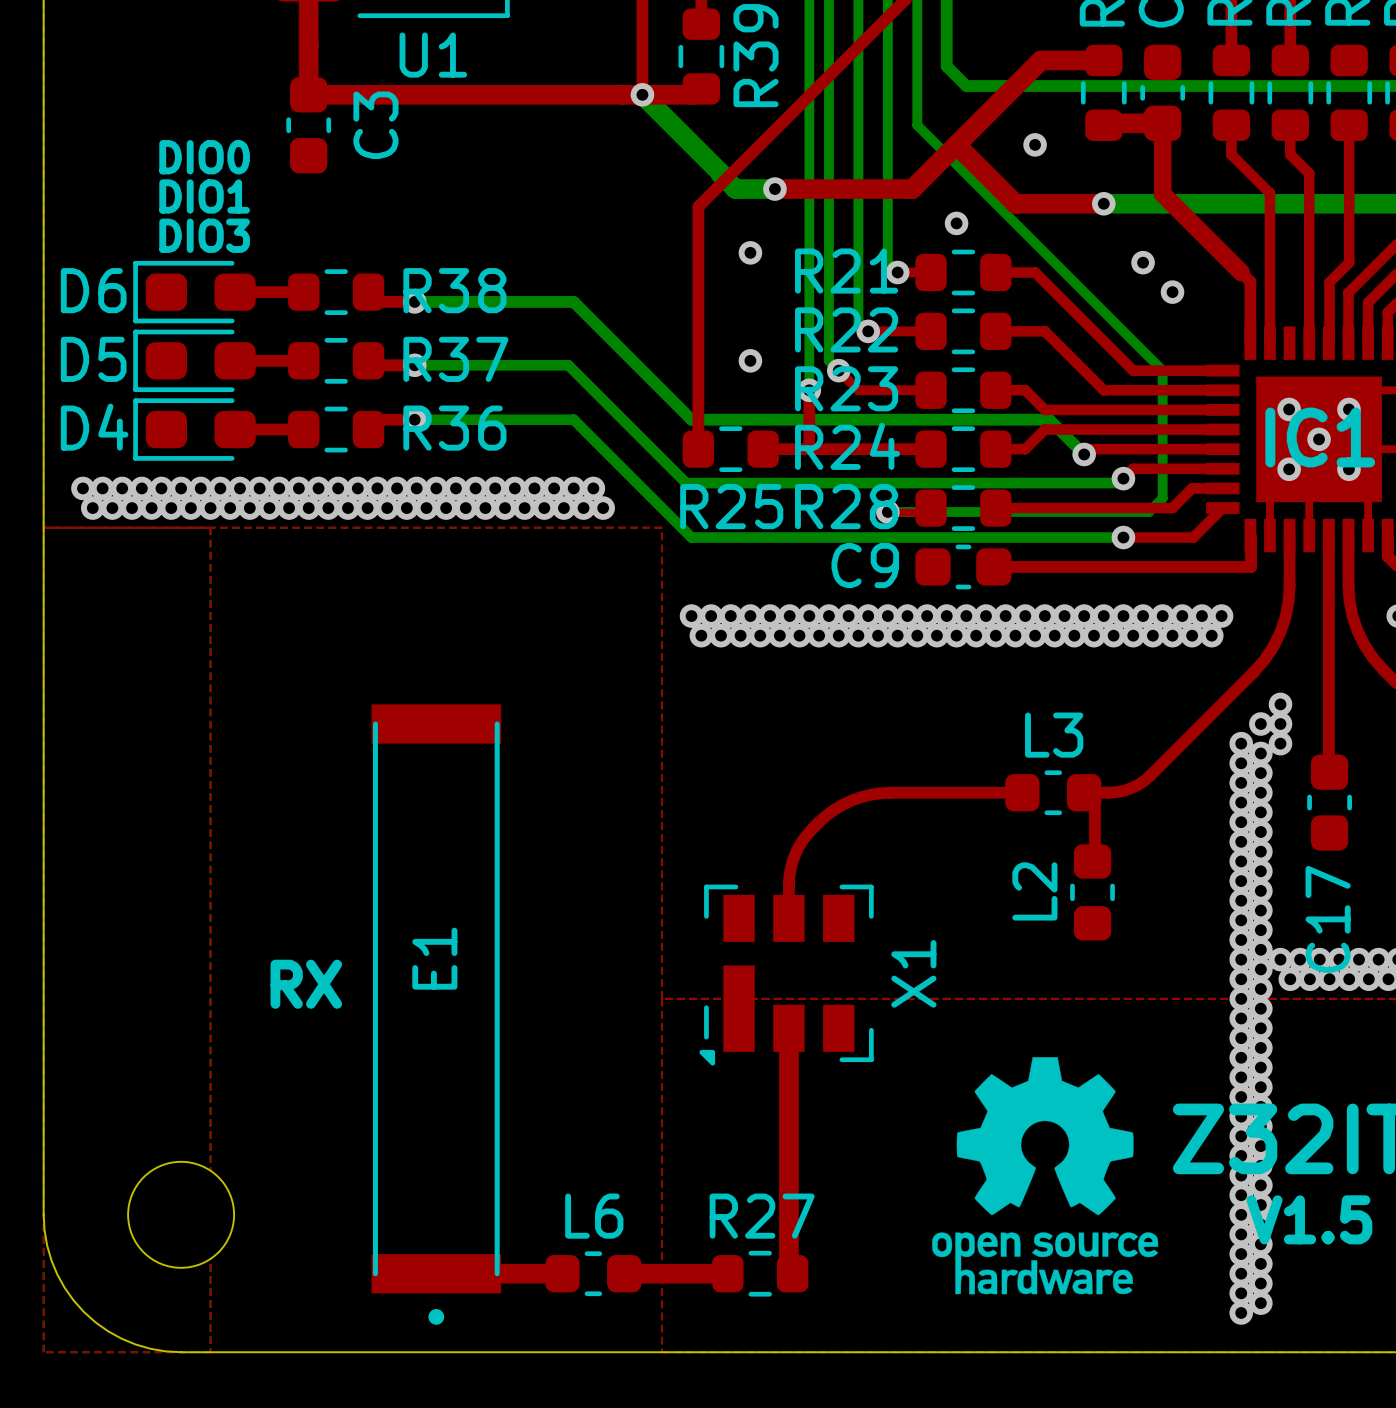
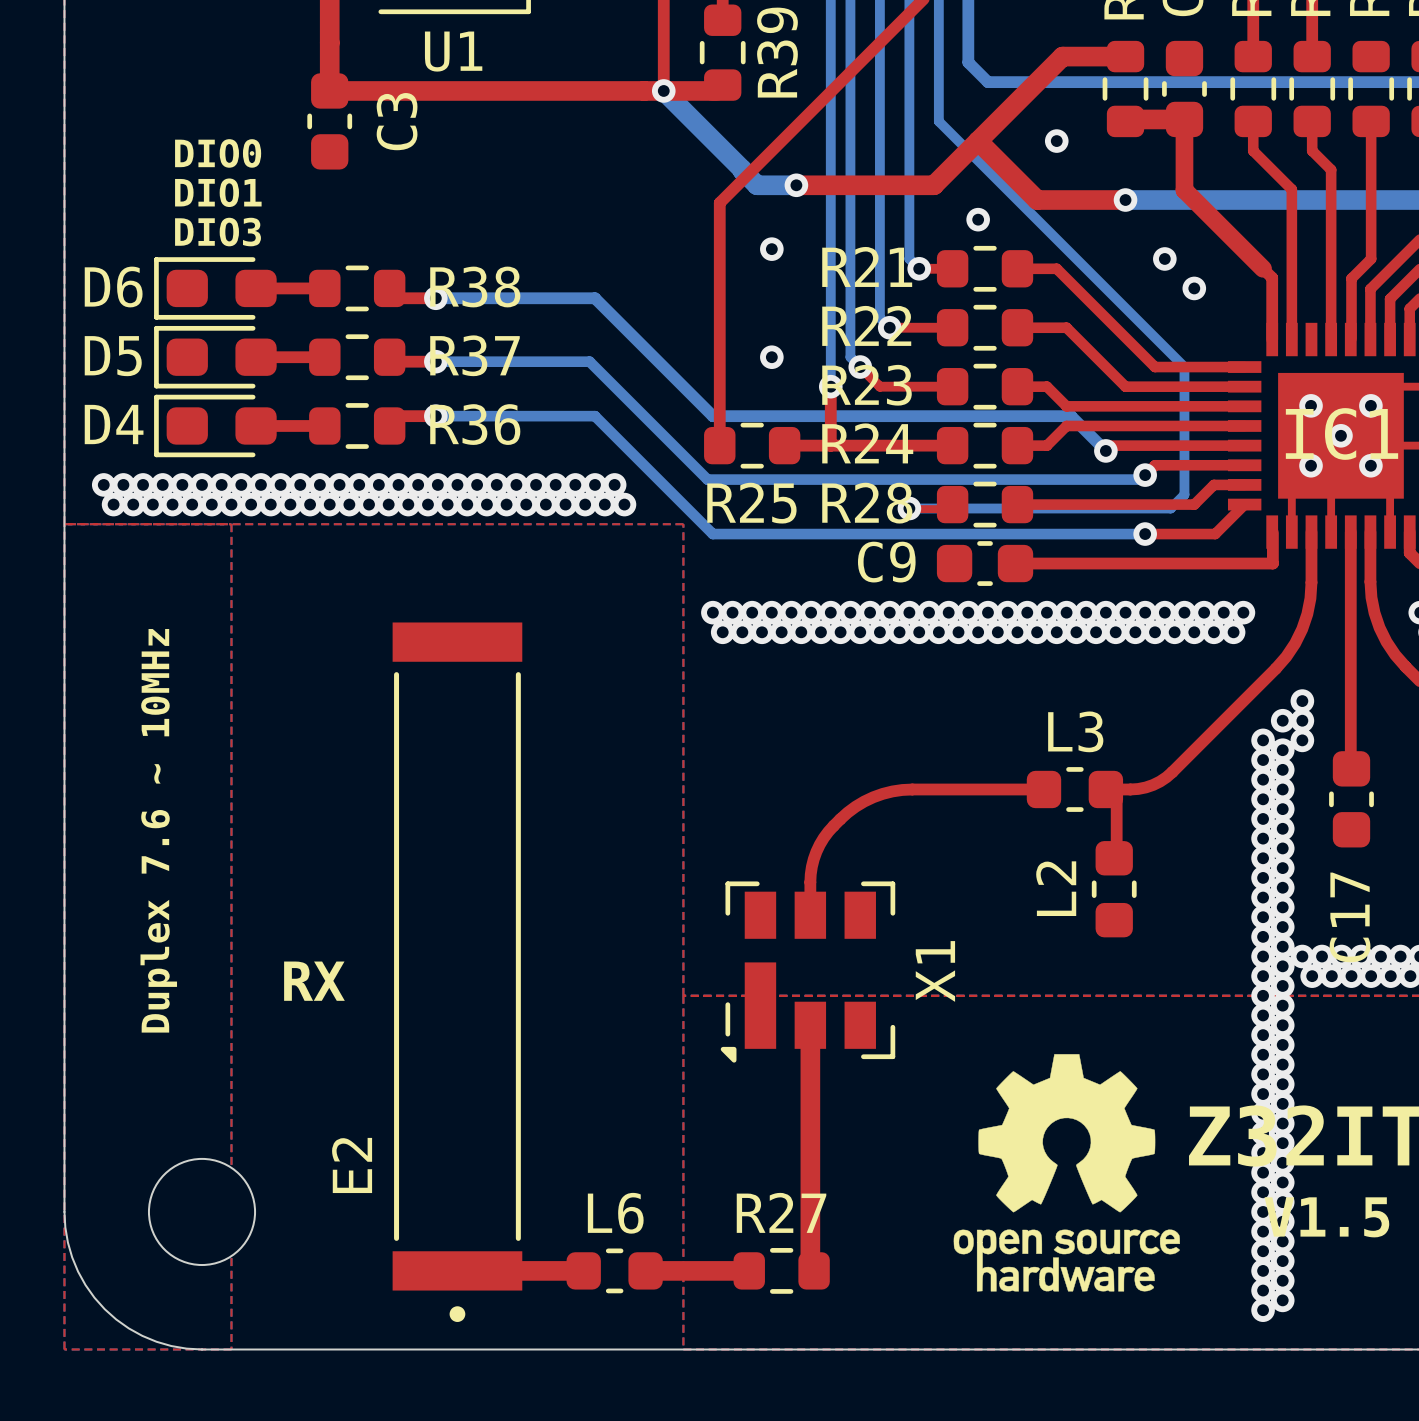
text: none -> Duplex 7.6 ~ 10MHz (158, 830)
E2: none -> (457, 972)
E1: (436, 1014) -> none

